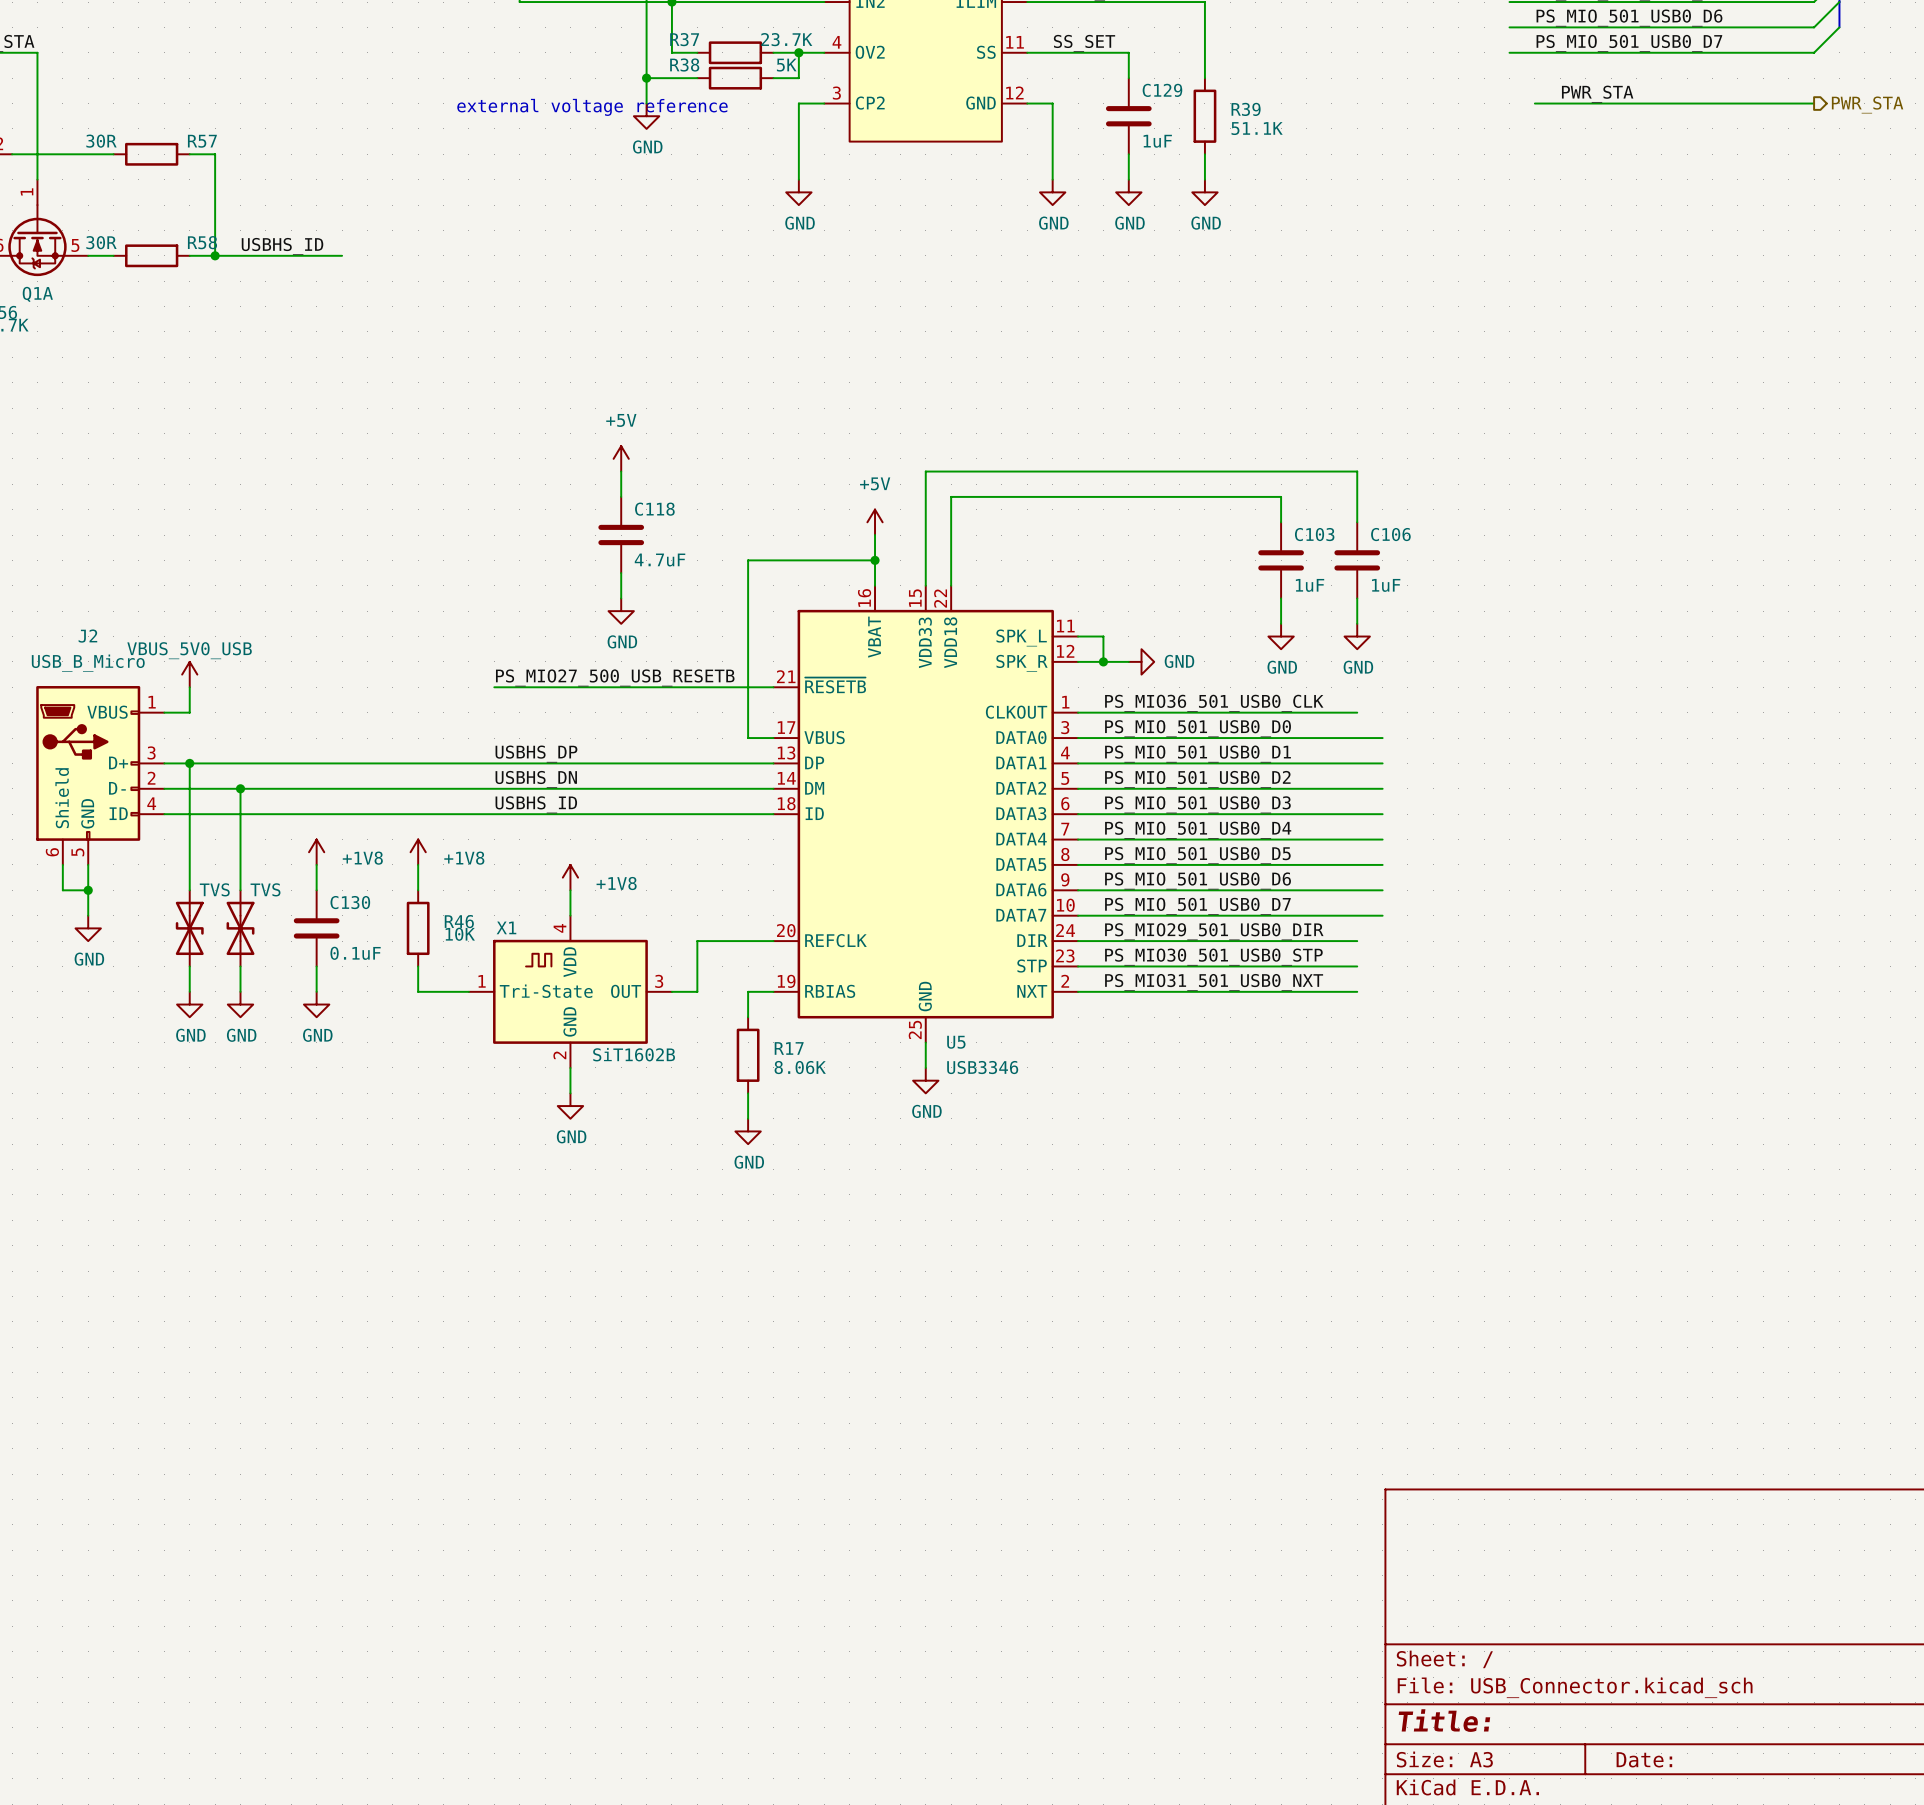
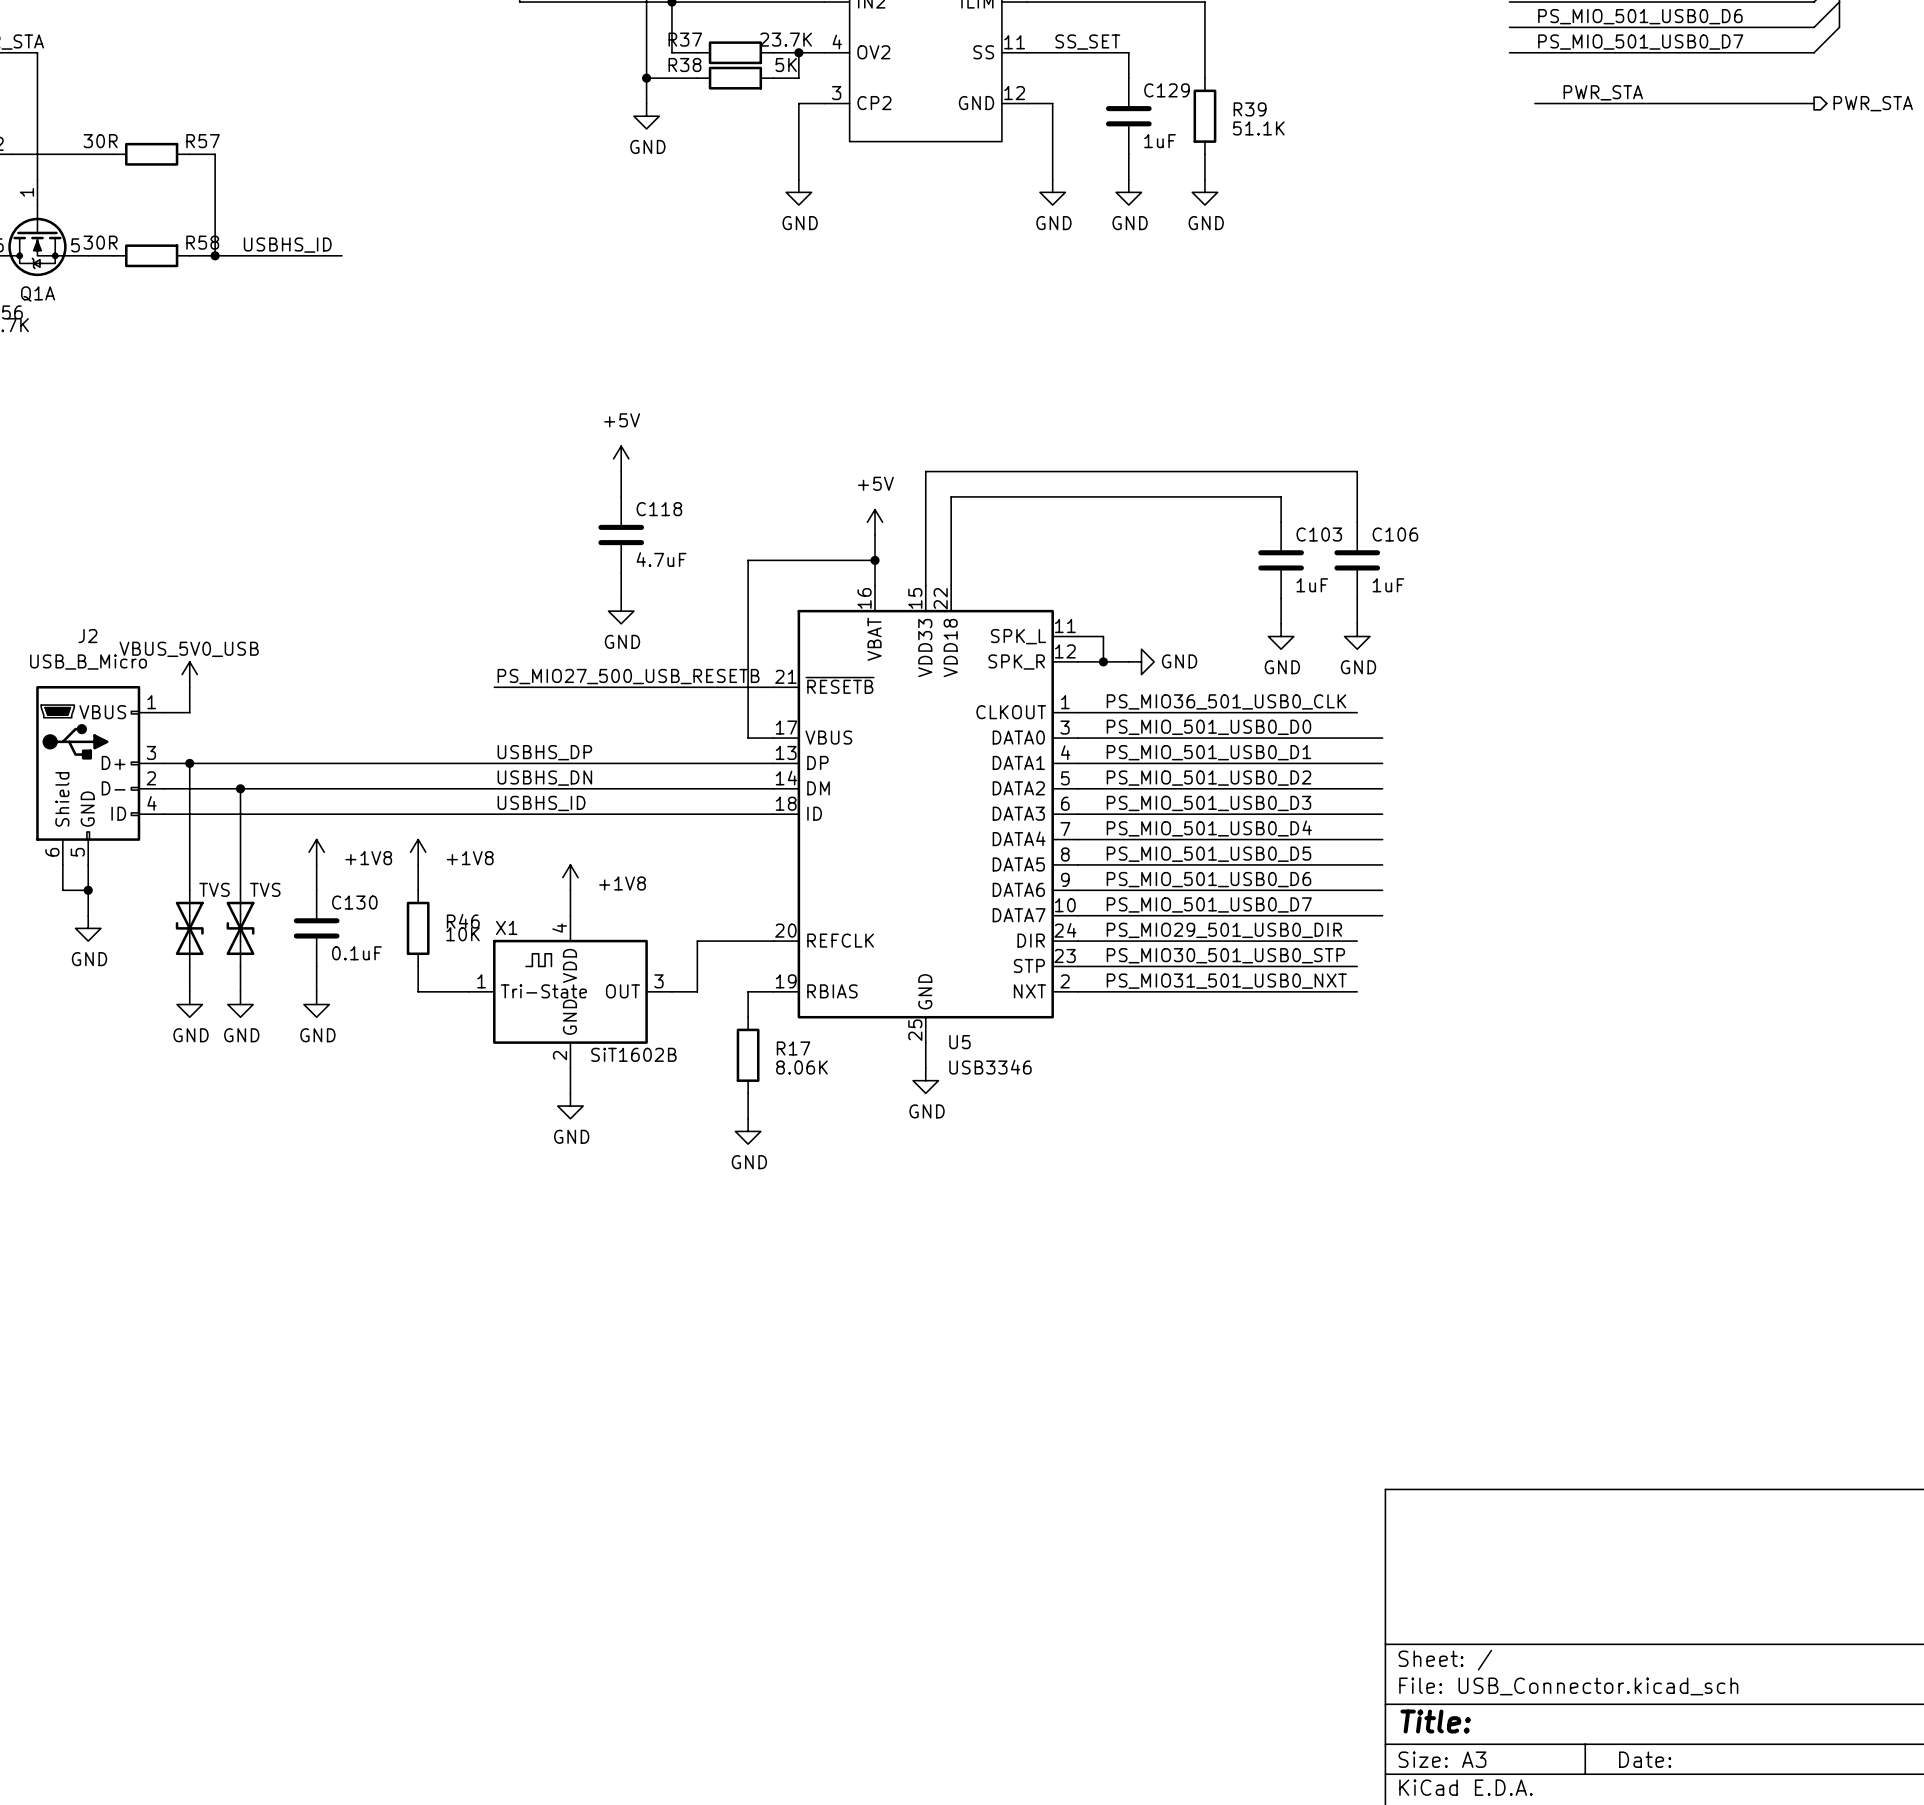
text: external voltage reference (592, 107) -> none

